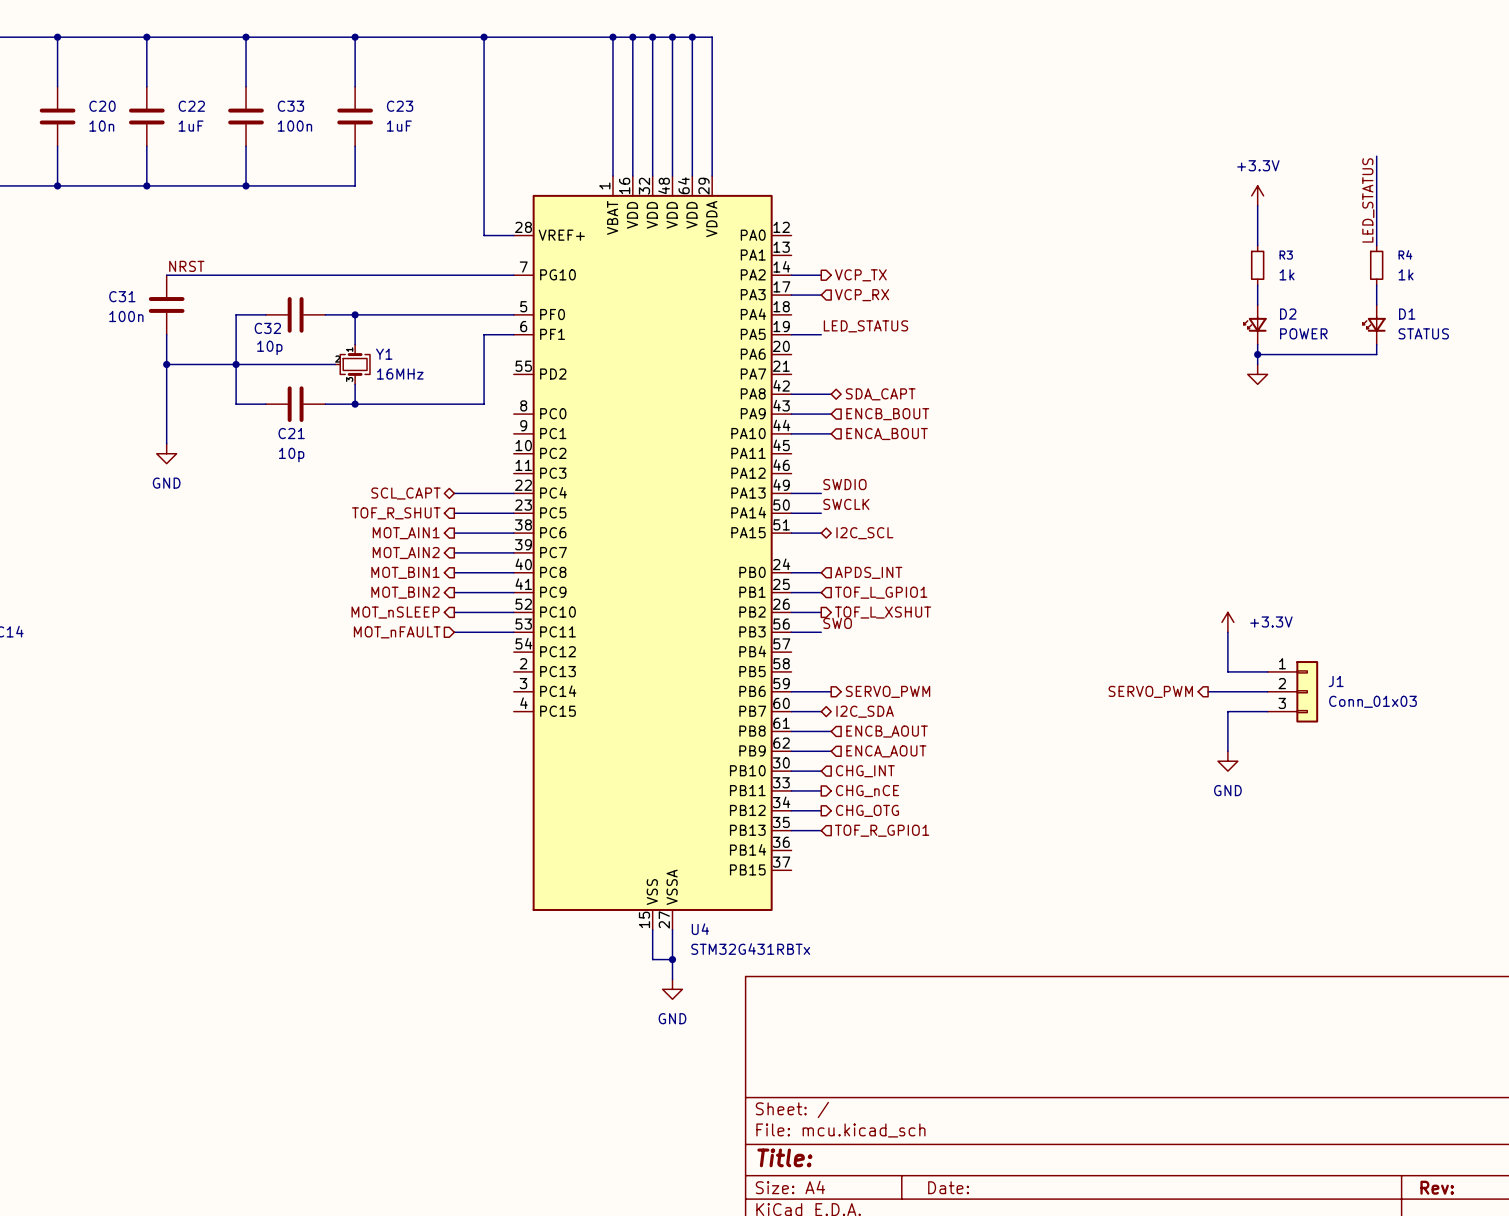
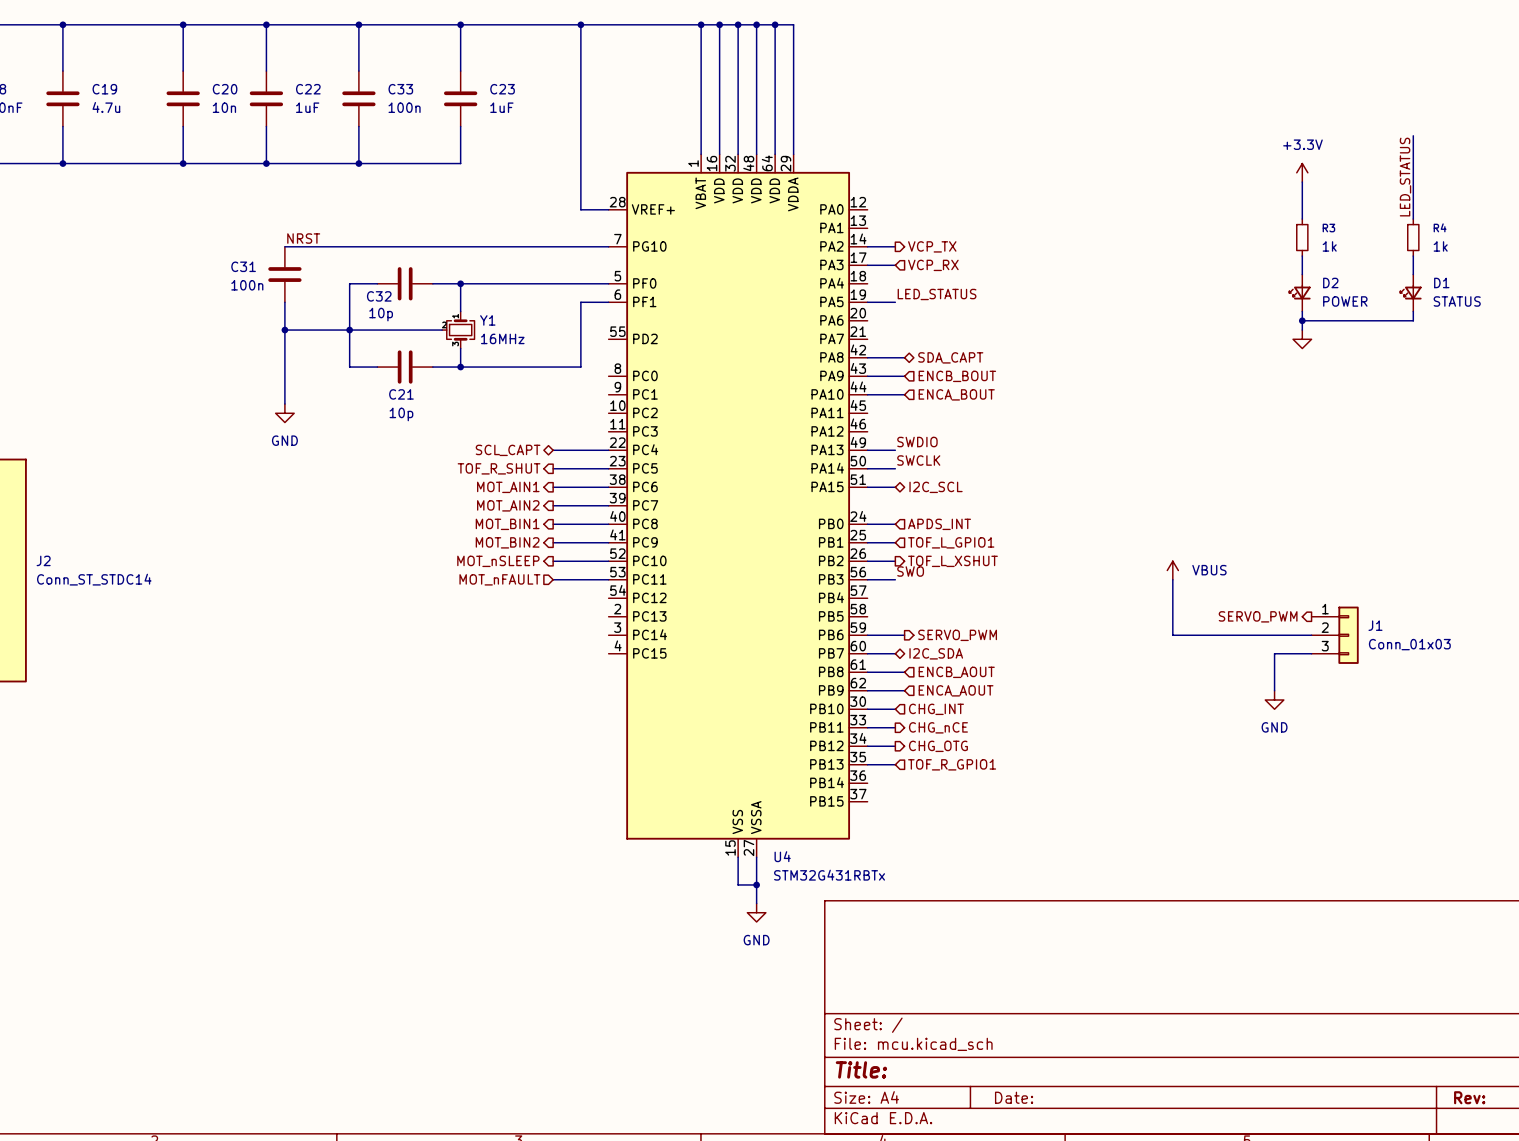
power symbol: none -> VBUS (1172, 570)
power symbol: +3.3V (1227, 622) -> none
wire: none -> (1172, 579) (1172, 635) (1256, 635)
wire: (1227, 632) (1227, 671) (1267, 671) -> none
hierarchical label position: SERVO_PWM (1150, 691) -> SERVO_PWM (1258, 616)

